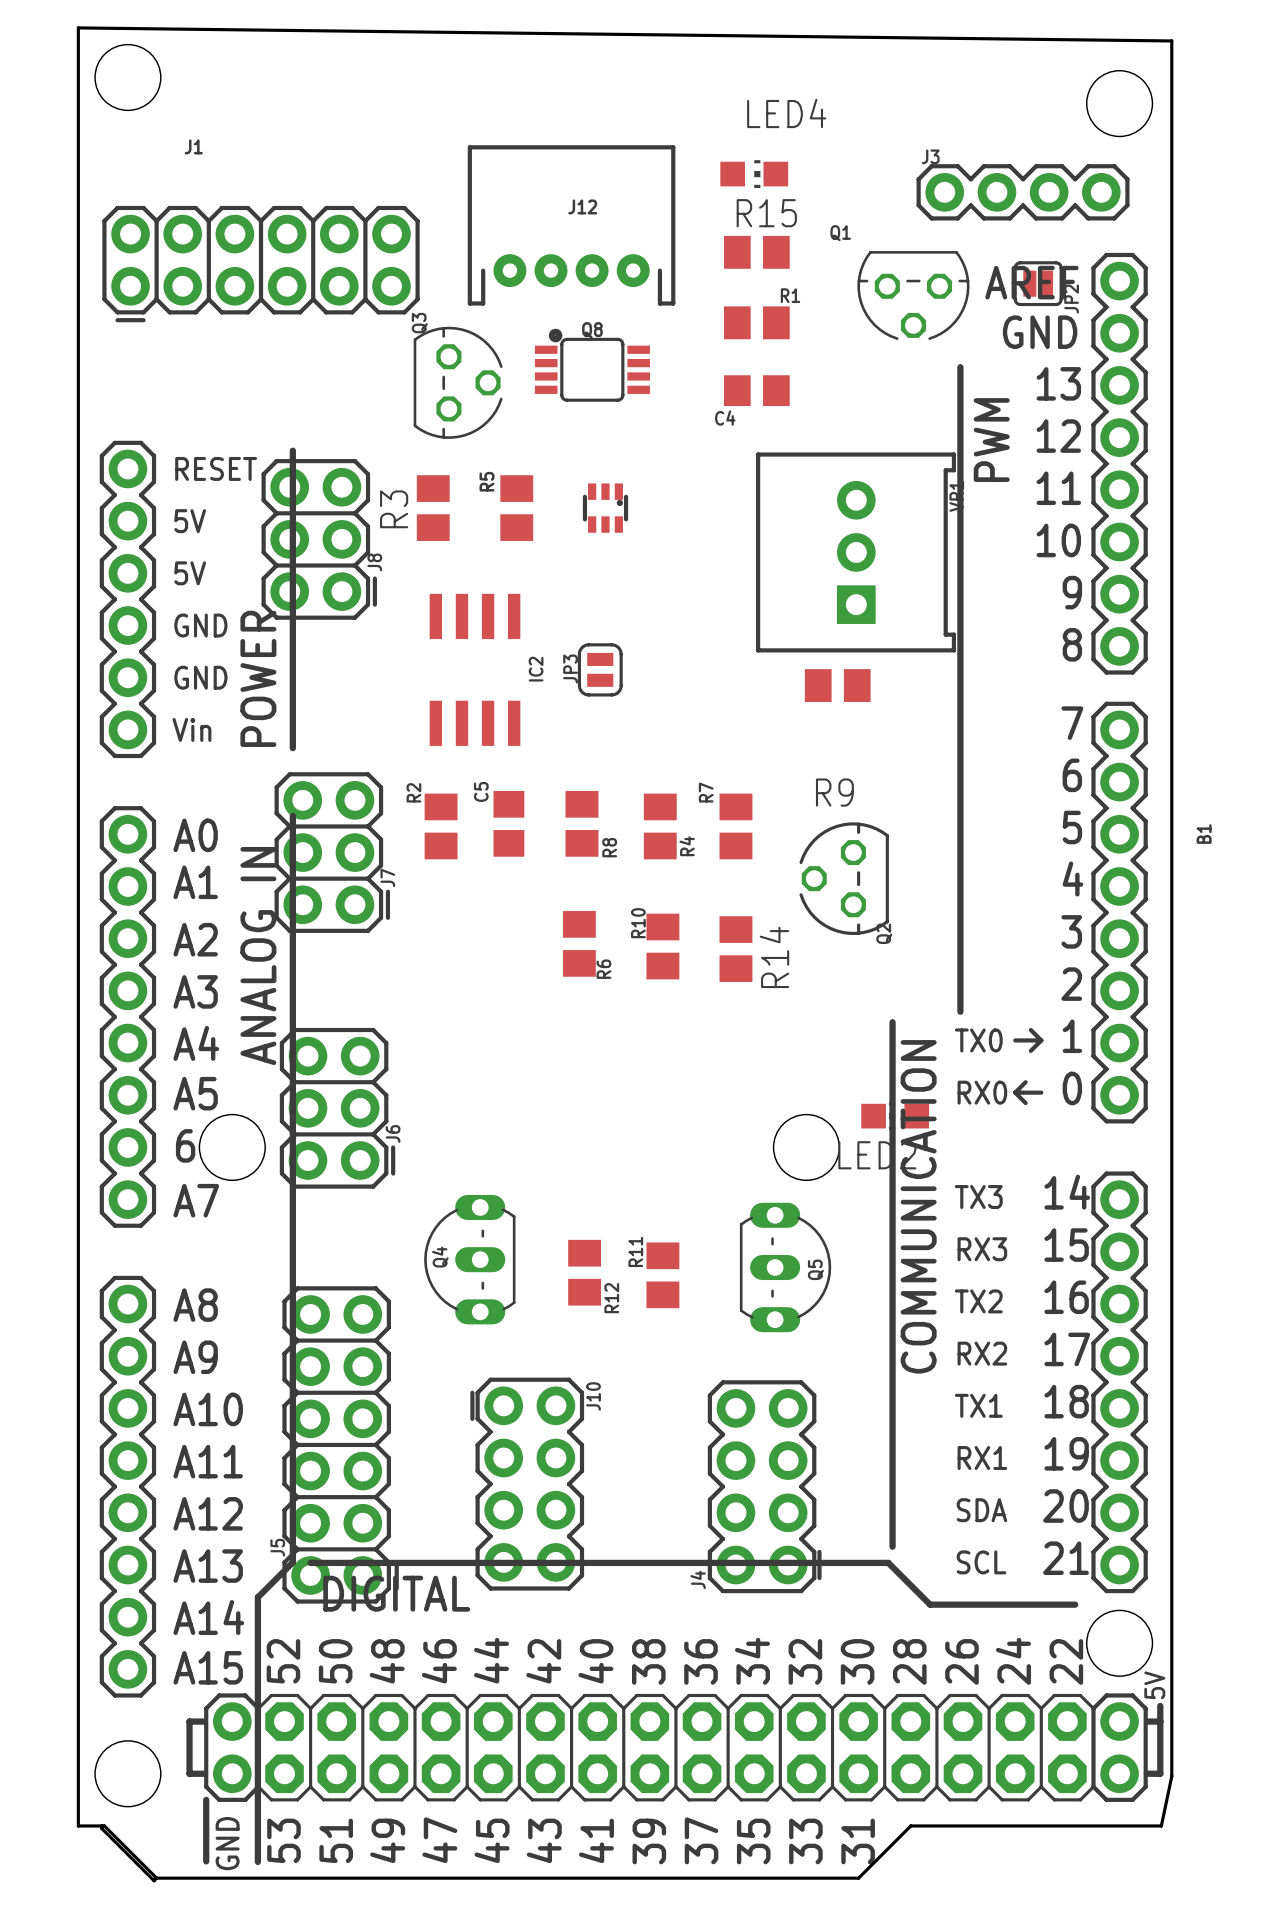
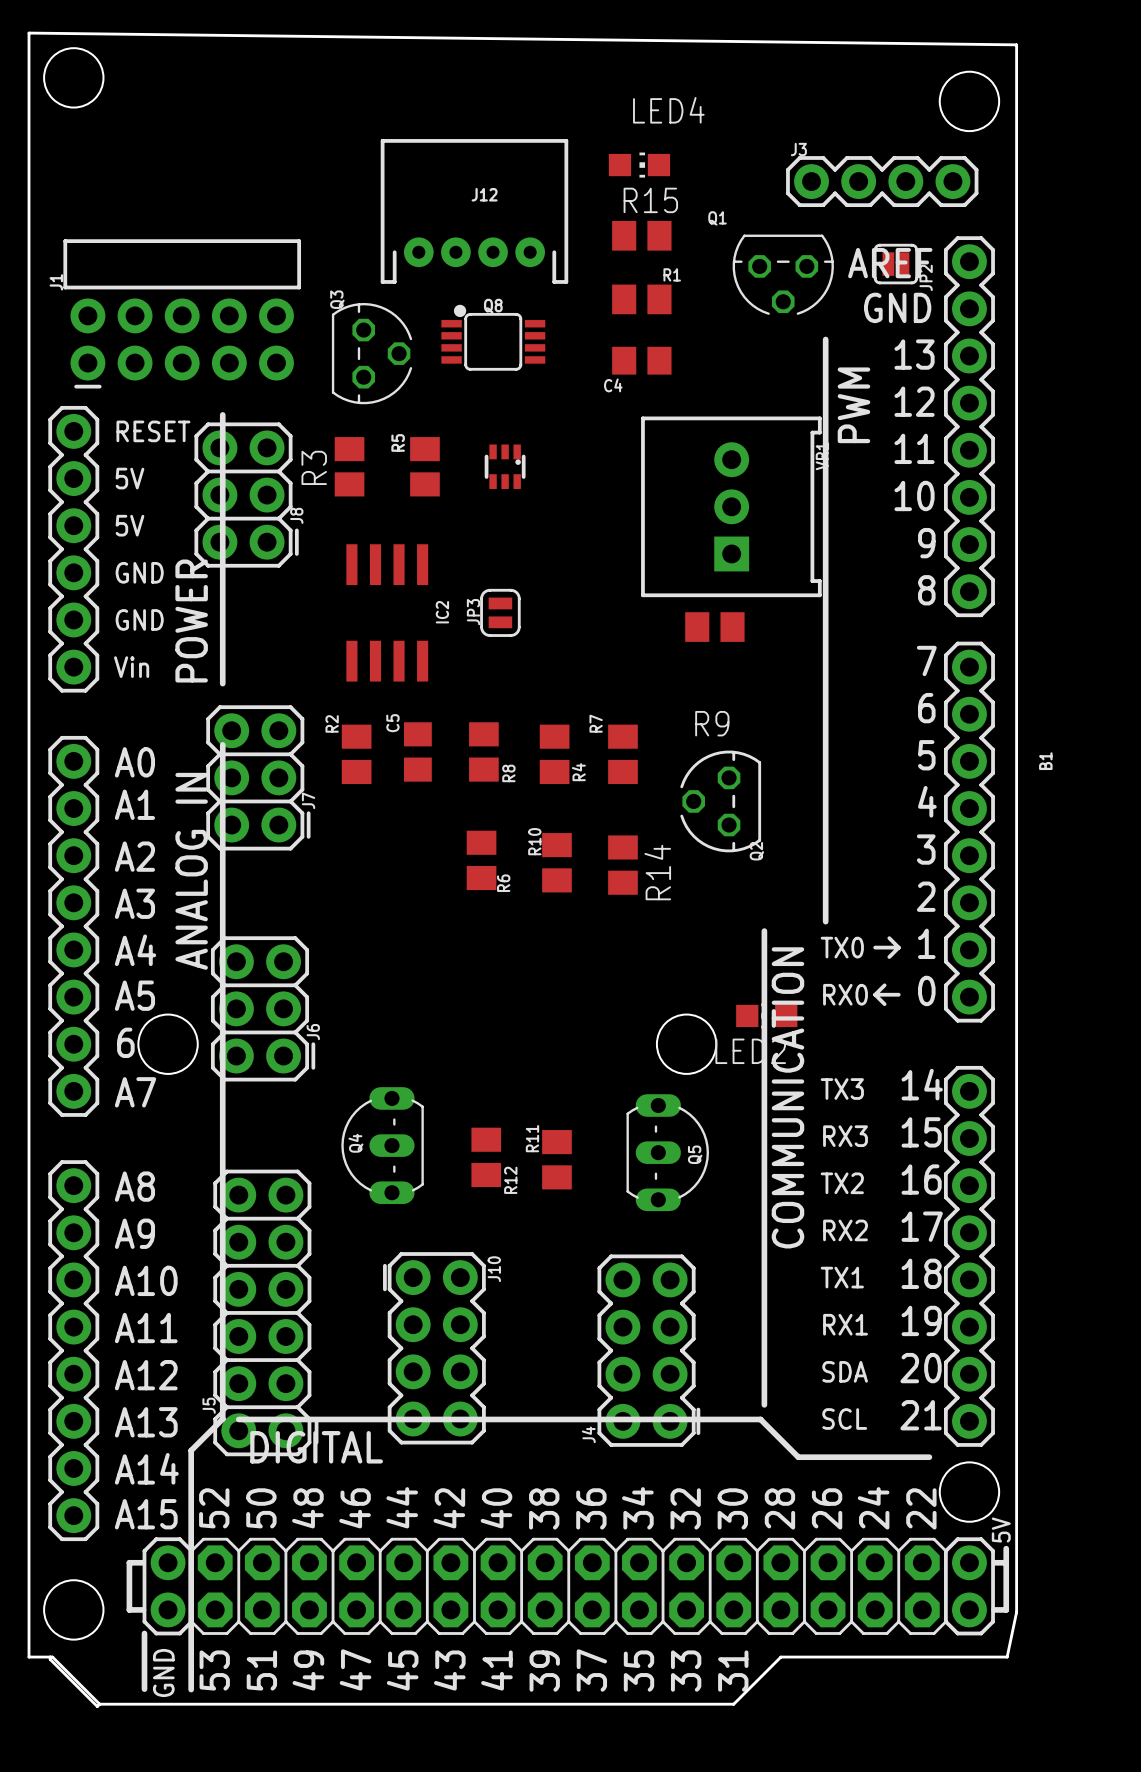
J1 name position: J1 (193, 146) -> J1 (56, 282)
J1 footprint: [102, 205, 420, 323] -> [63, 239, 302, 389]

